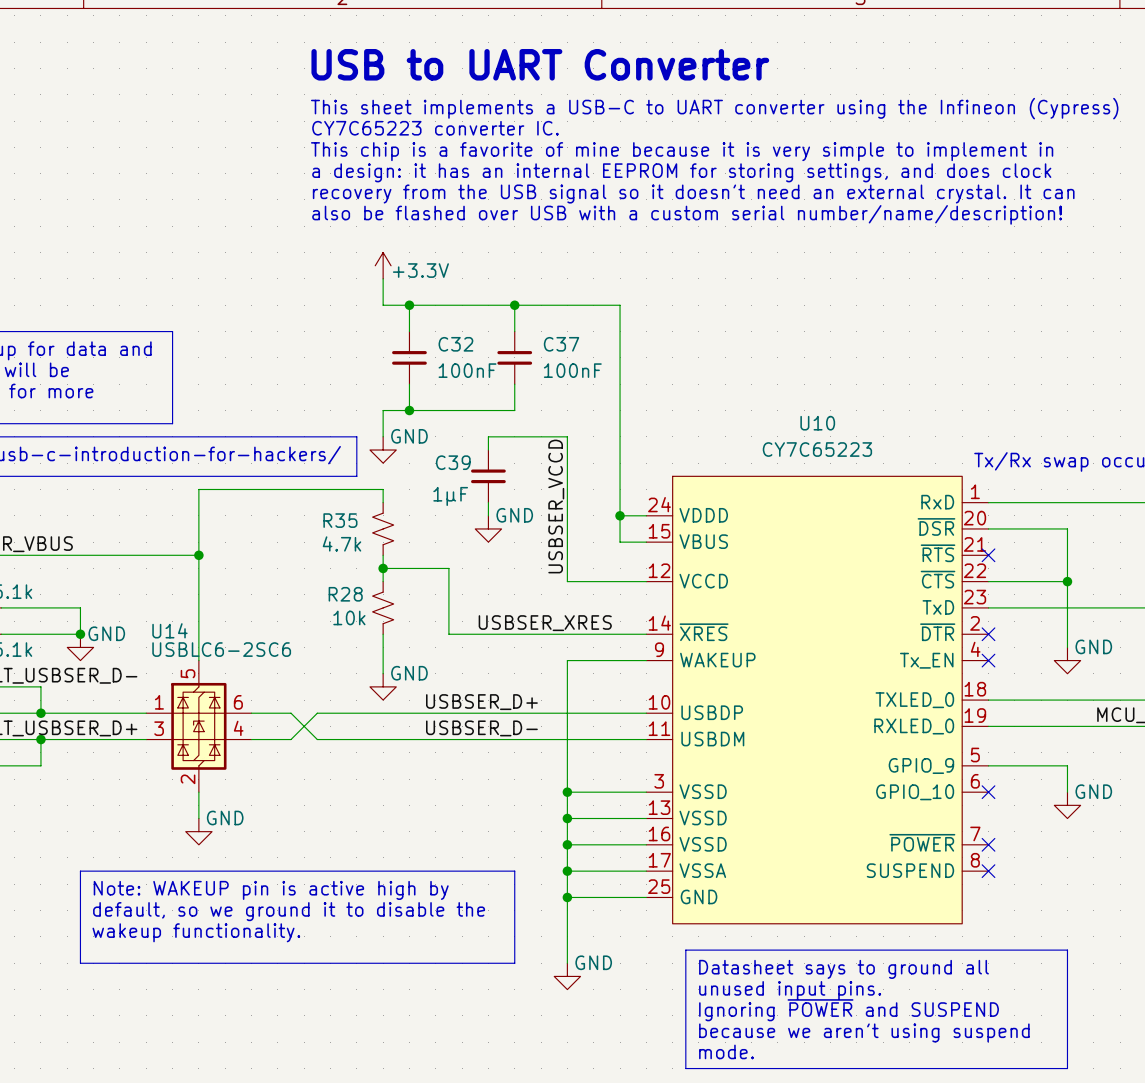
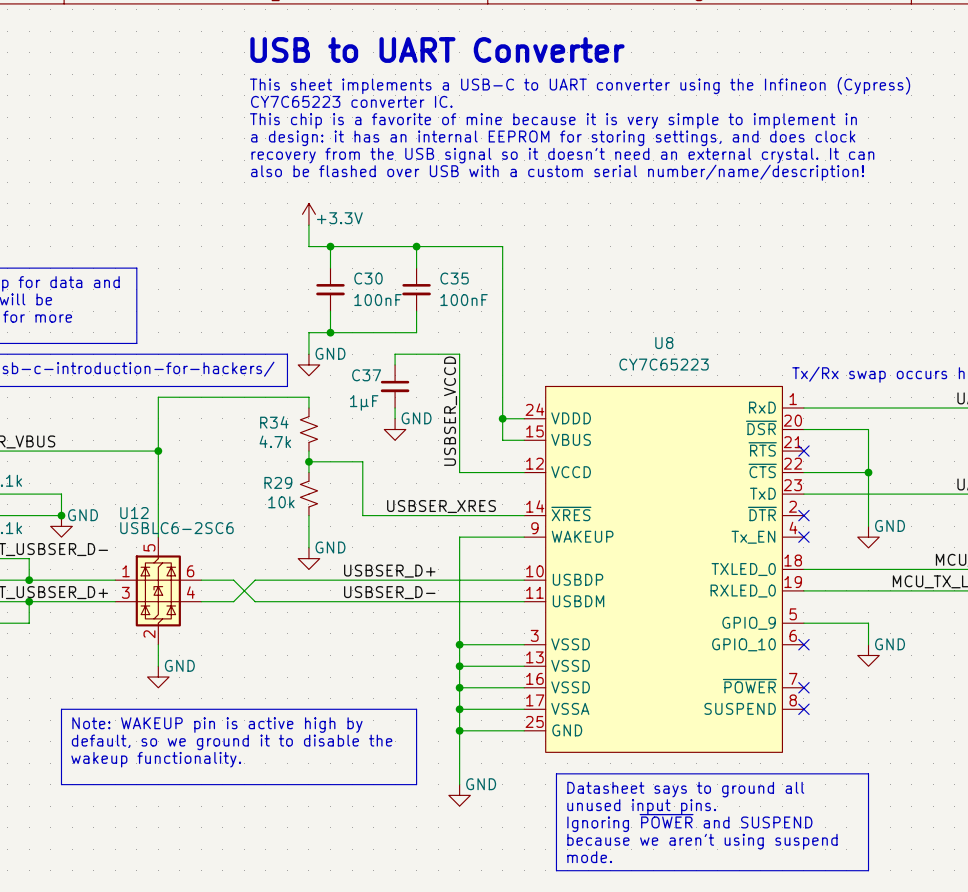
C37 symbol: [497, 331, 533, 385] -> [380, 364, 410, 409]
C37 name position: C37 (561, 344) -> C37 (366, 375)
C32: 100nF (409, 357) -> none
C30: none -> 100nF (330, 289)
C35: none -> 100nF (416, 289)
U10 name: U10 (817, 423) -> U8 (664, 343)
C39: 1µF (488, 476) -> none
R35 name: R35 (340, 520) -> R34 (274, 422)
R28 name: R28 (345, 594) -> R29 (278, 482)
U14 name: U14 (169, 630) -> U12 (134, 513)

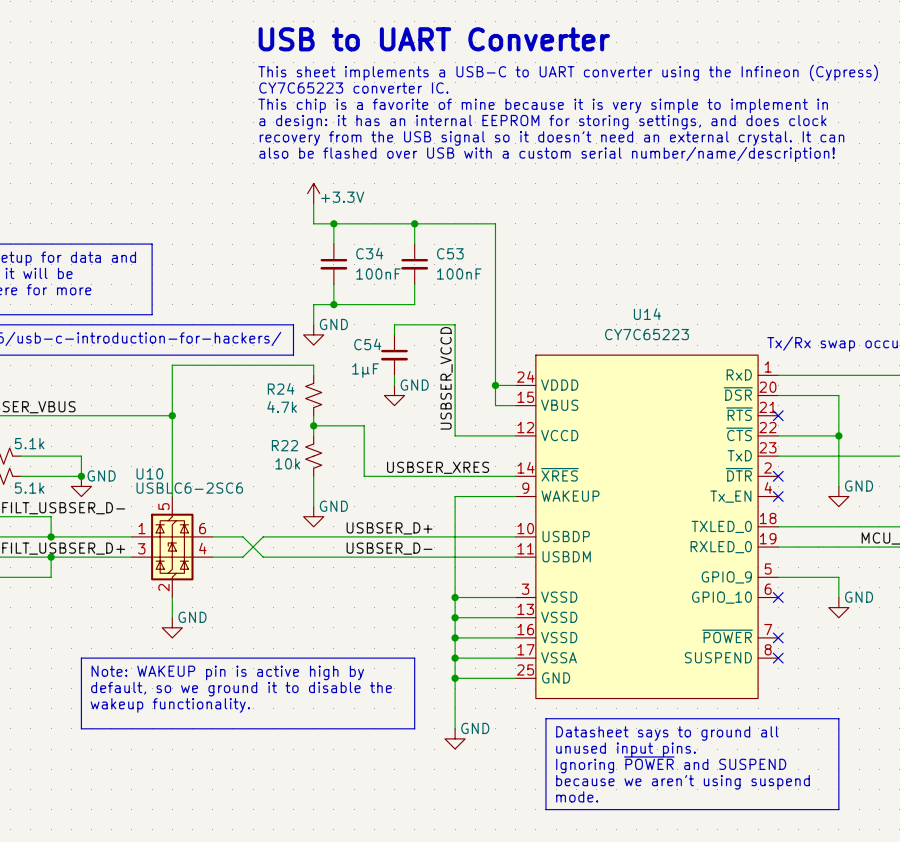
C30 name: C30 (368, 278) -> C34 (369, 253)
C35 name: C35 (454, 278) -> C53 (450, 253)
U8 name: U8 (664, 343) -> U14 (647, 314)
C37 name: C37 (366, 375) -> C54 (367, 344)
R34 name: R34 (274, 422) -> R24 (281, 388)
R29 name: R29 (278, 482) -> R22 (284, 445)
U12 name: U12 (134, 513) -> U10 (149, 473)

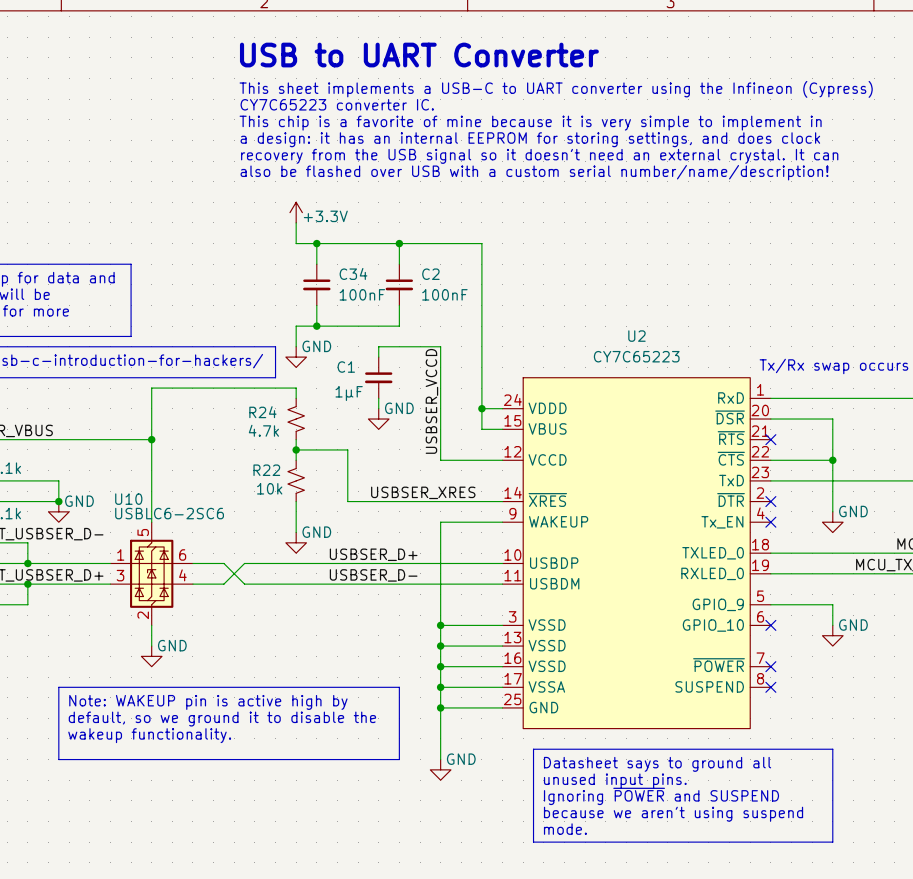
C53 name: C53 (450, 253) -> C2 (430, 274)
U14 name: U14 (647, 314) -> U2 (636, 336)
C54 name: C54 (367, 344) -> C1 (346, 367)

